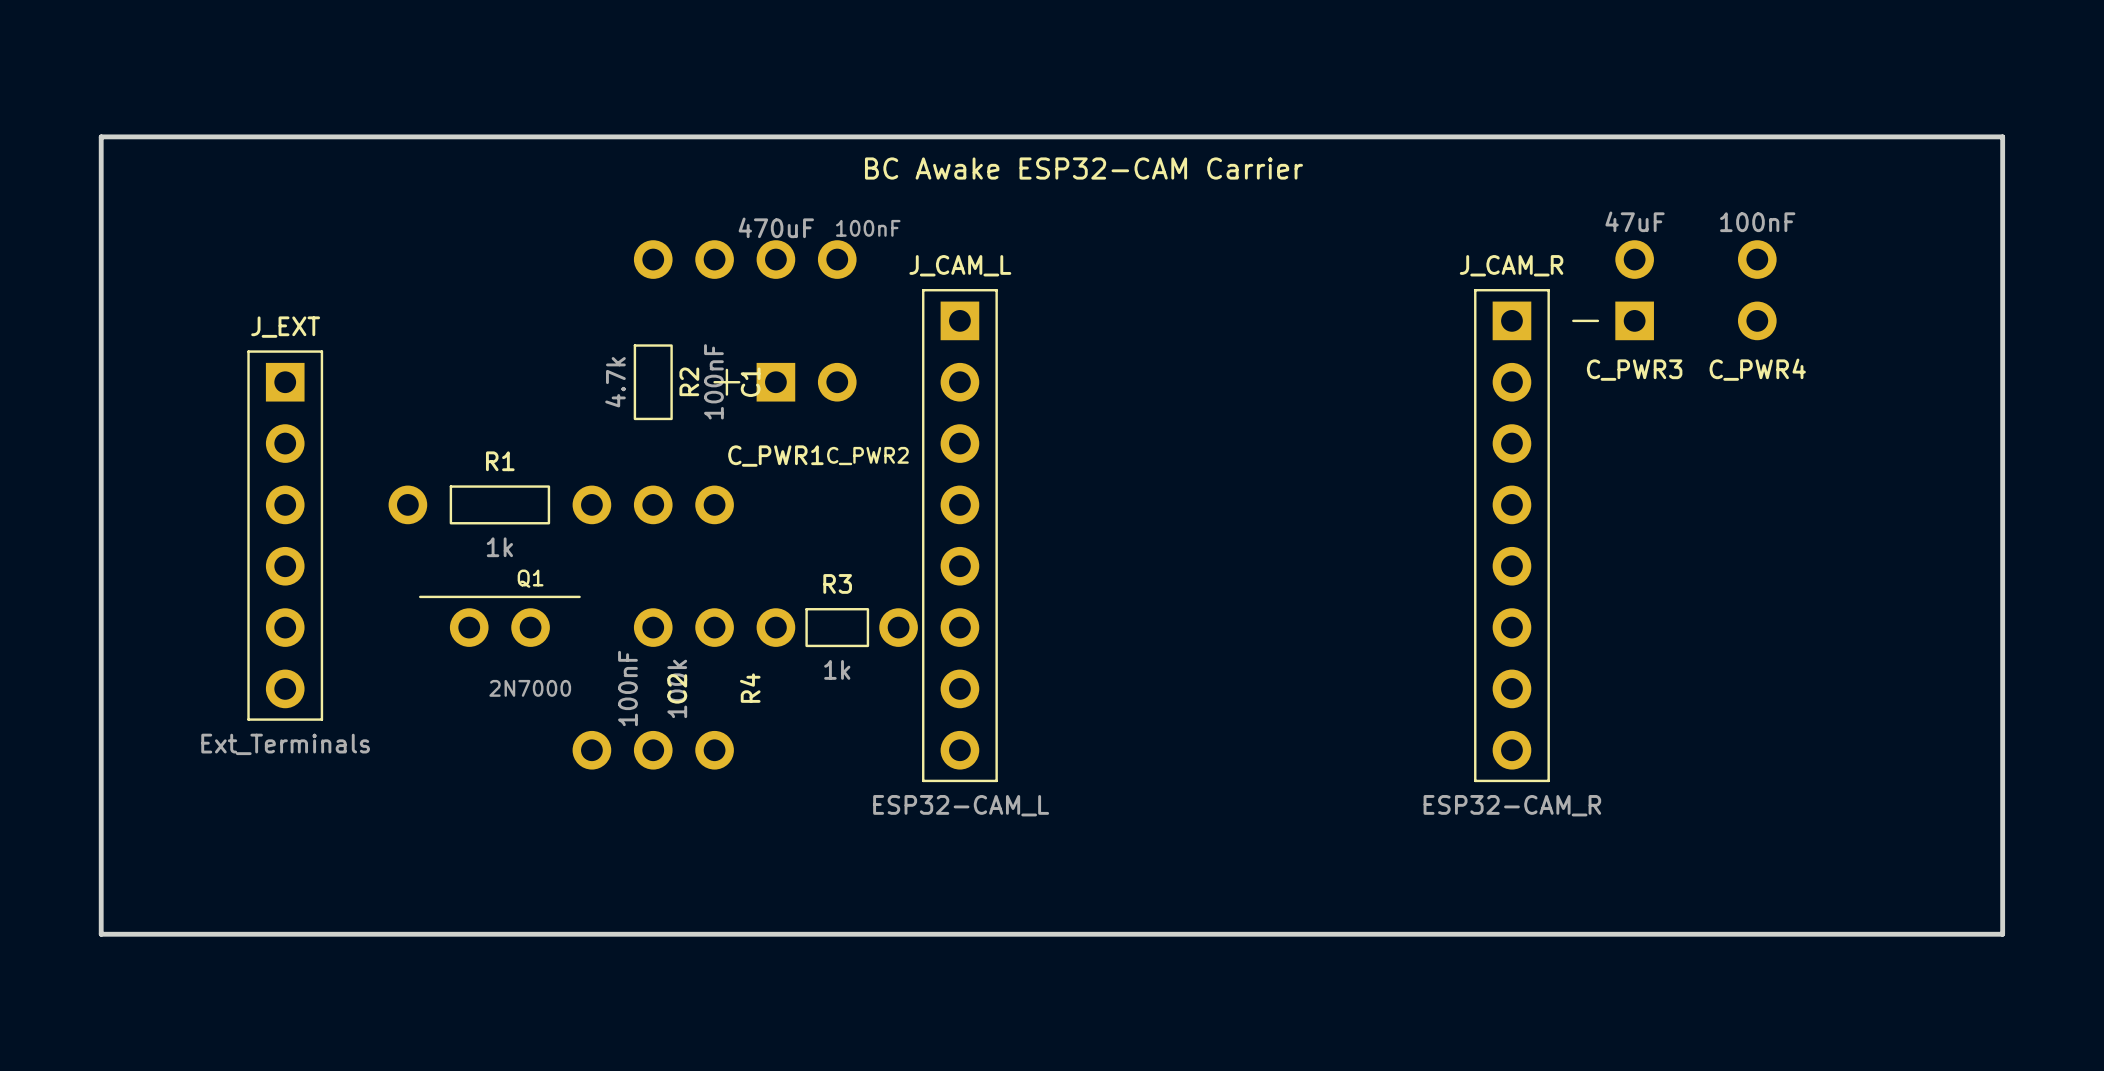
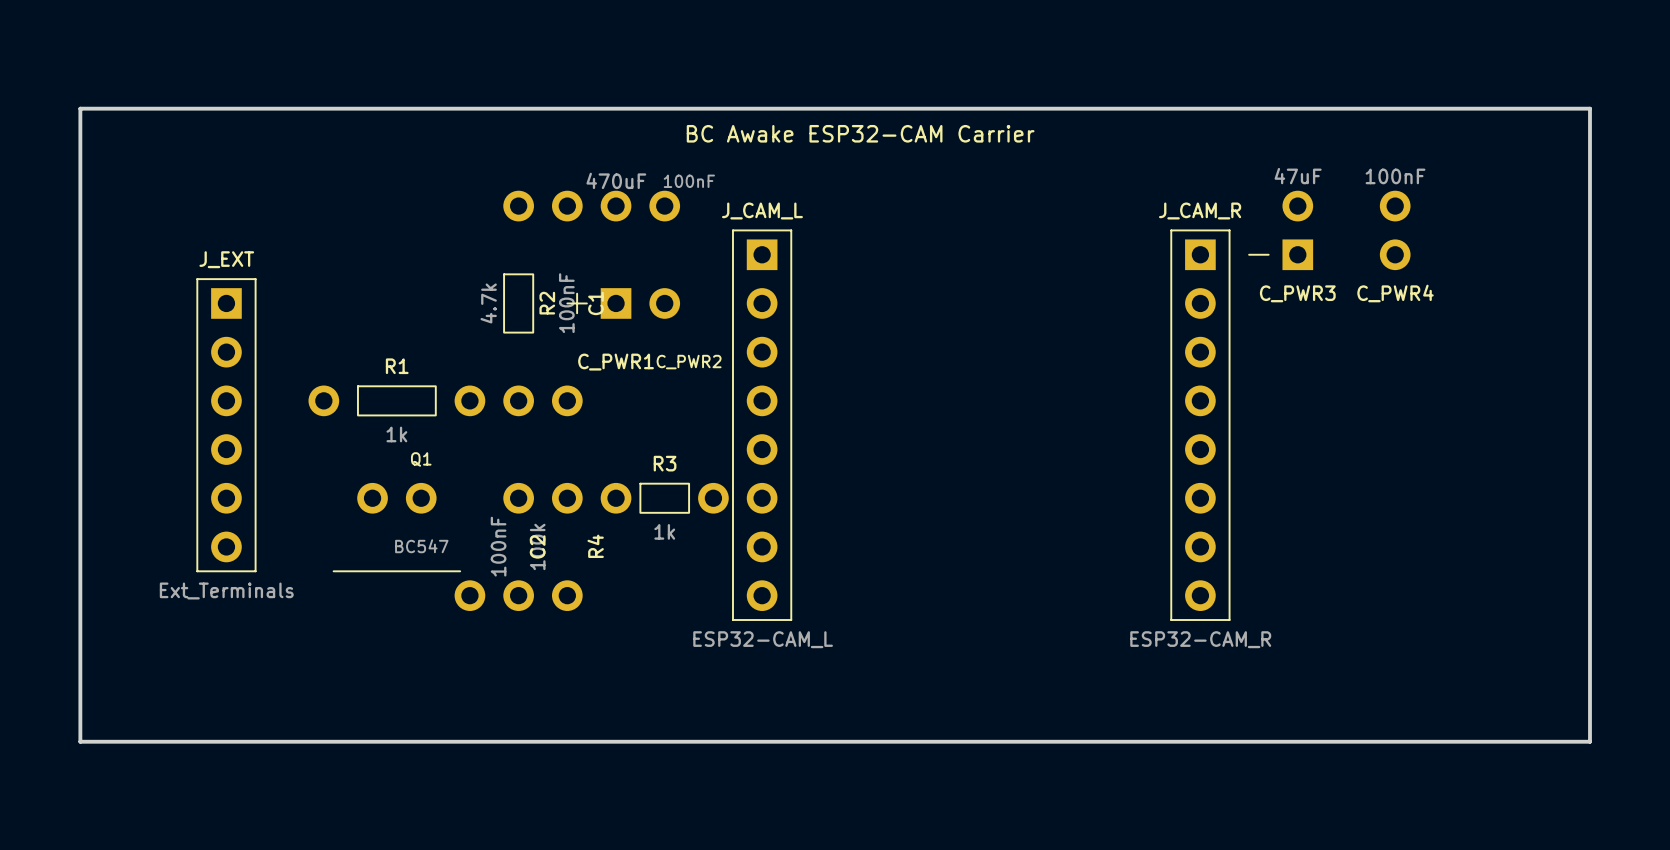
Q1 footprint: [419, 595, 612, 770] -> [332, 482, 486, 611]
Q1 value: 2N7000 (530, 688) -> BC547 (421, 546)

